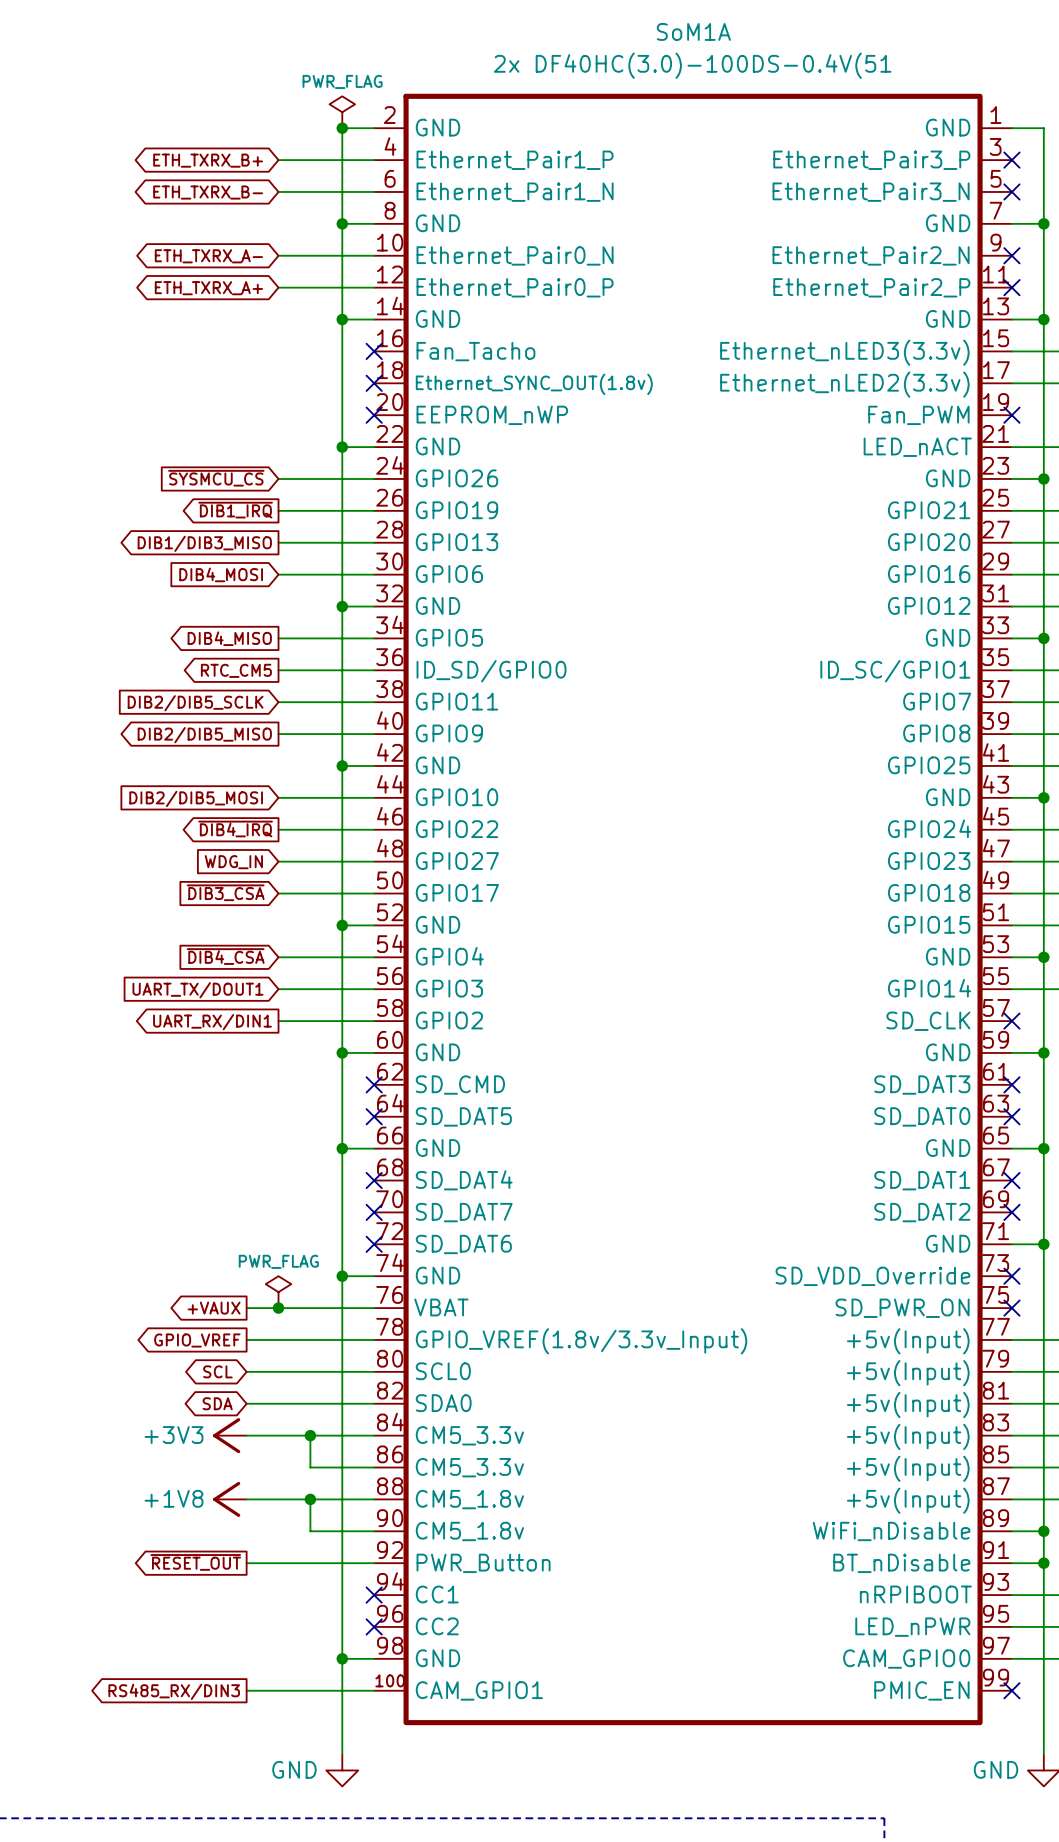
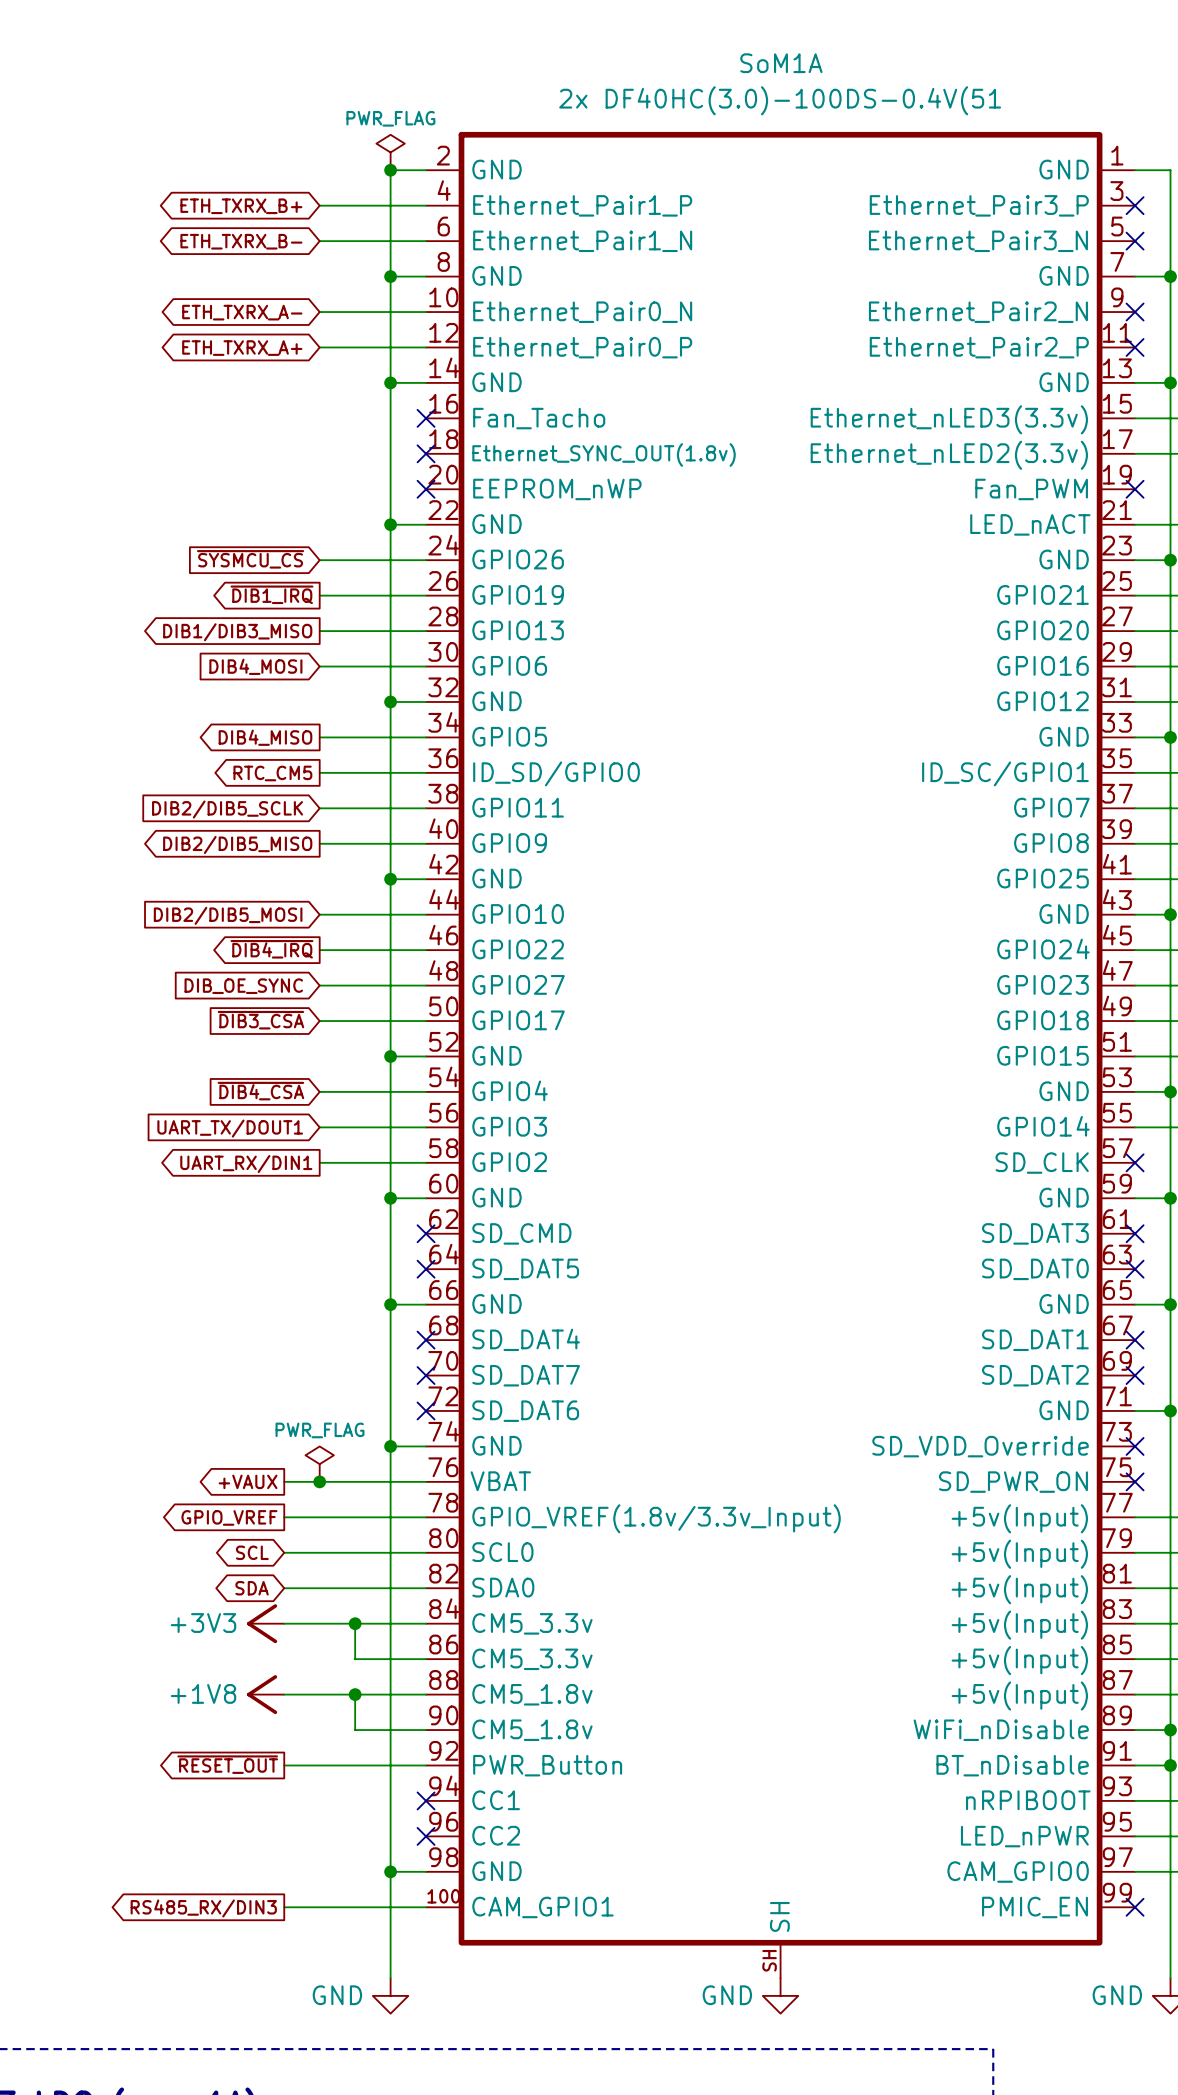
SoM1A symbol: [374, 93, 1012, 1726] -> [426, 131, 1136, 1979]
global label: WDG_IN (233, 862) -> DIB_OE_SYNC (243, 986)
power symbol: none -> GND (780, 1995)

